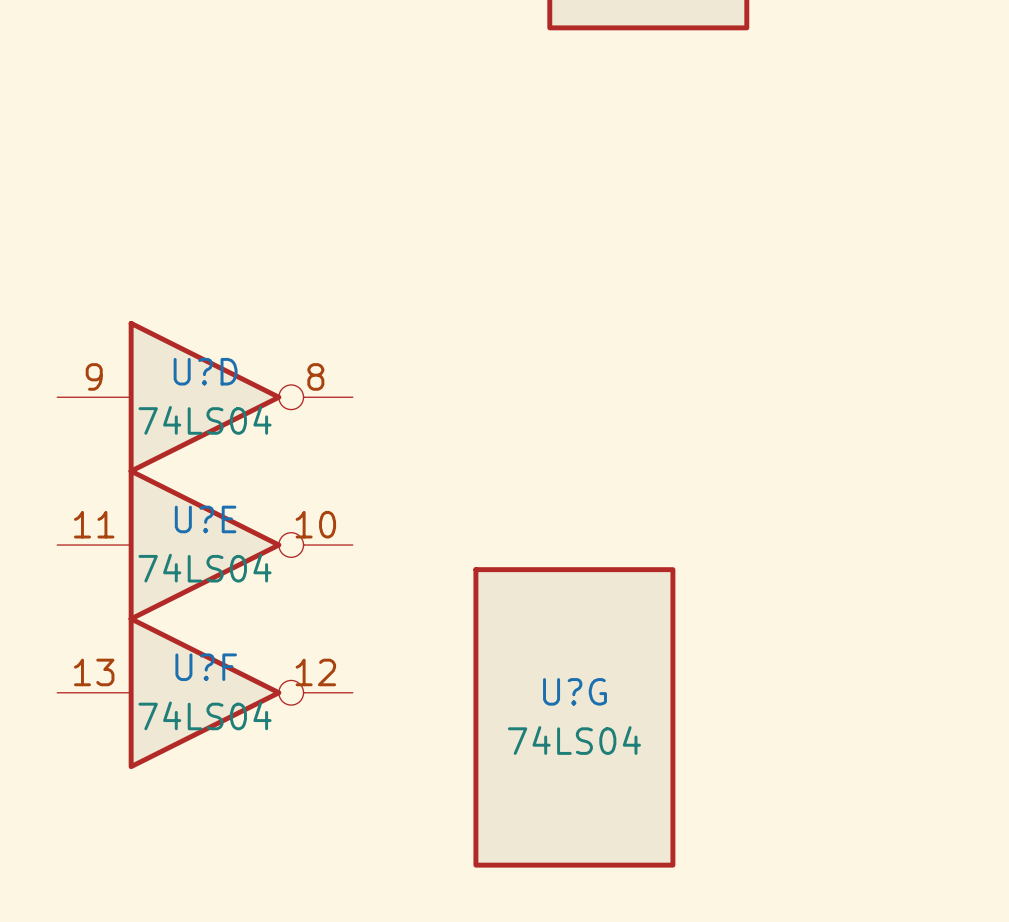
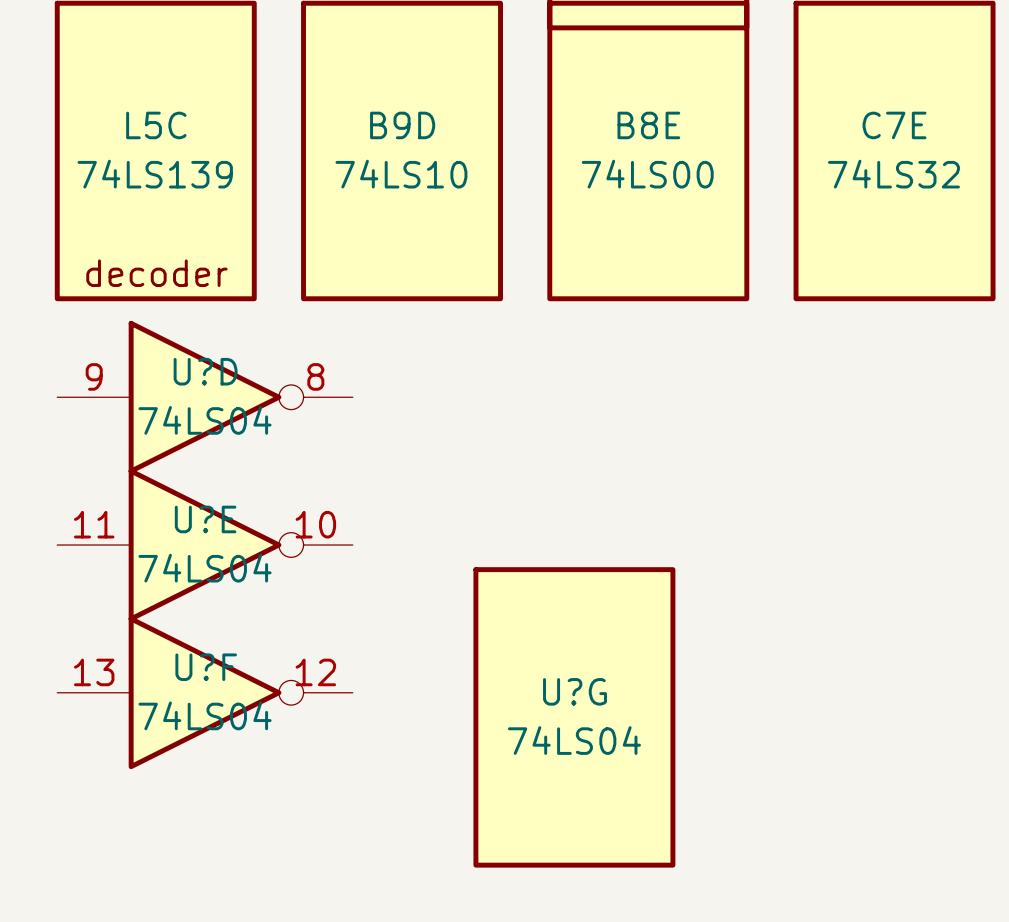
L5C: none -> 74LS139 (155, 150)
B9D: none -> 74LS10 (402, 150)
B8E: none -> 74LS00 (648, 150)
C7E: none -> 74LS32 (894, 150)

